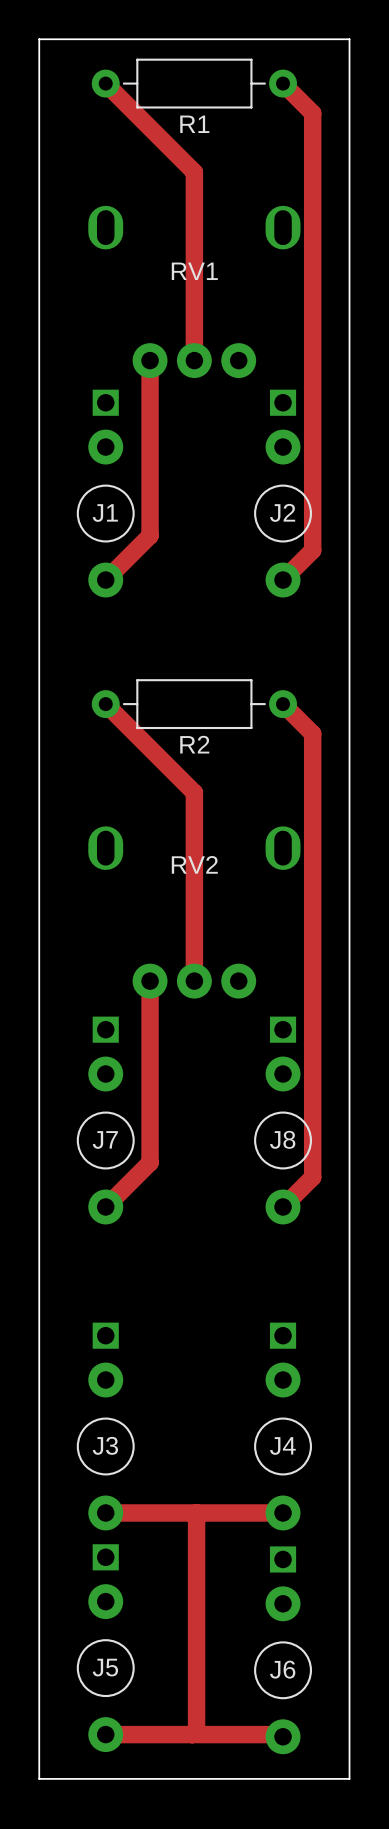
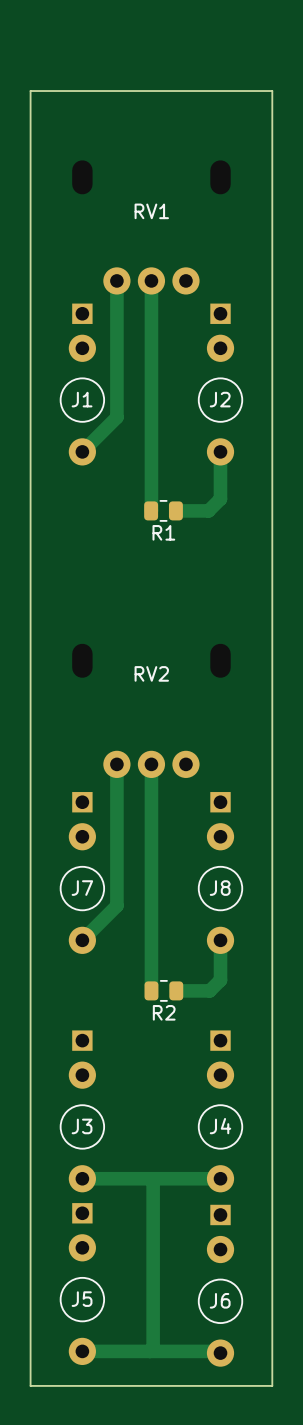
R1 footprint: [91, 58, 297, 109] -> [144, 500, 183, 522]
track: (105, 83) (194, 172) (194, 360) -> (151, 510) (151, 280)
track: (283, 83) (312, 113) (312, 550) (283, 580) -> (175, 510) (208, 510) (220, 499) (220, 451)
board edge: (39, 116) (39, 39) (349, 39) (349, 116) -> (30, 91) (272, 91)
RV1 footprint: [88, 205, 301, 379] -> [72, 160, 231, 295]
R2 footprint: [91, 679, 297, 730] -> [144, 980, 184, 1002]
track: (105, 704) (194, 792) (194, 981) -> (151, 984) (151, 764)
track: (283, 704) (312, 733) (312, 1177) (283, 1206) -> (176, 990) (209, 990) (220, 980) (220, 940)
RV2 footprint: [88, 826, 301, 999] -> [72, 643, 231, 778]

